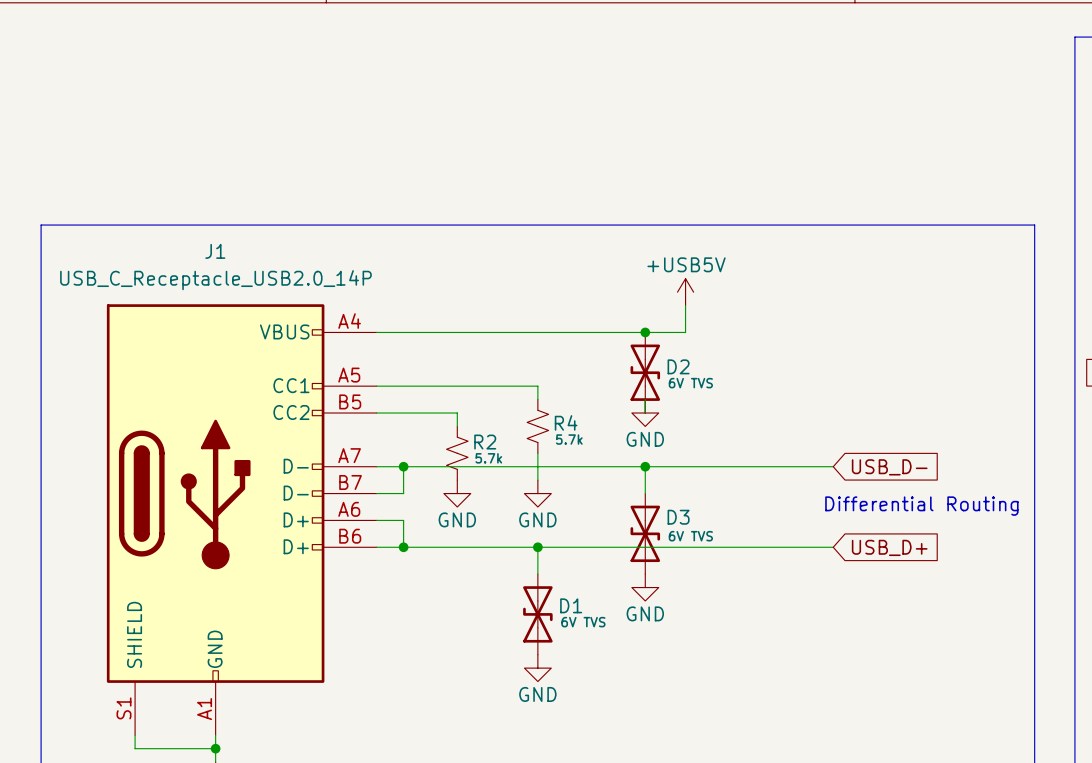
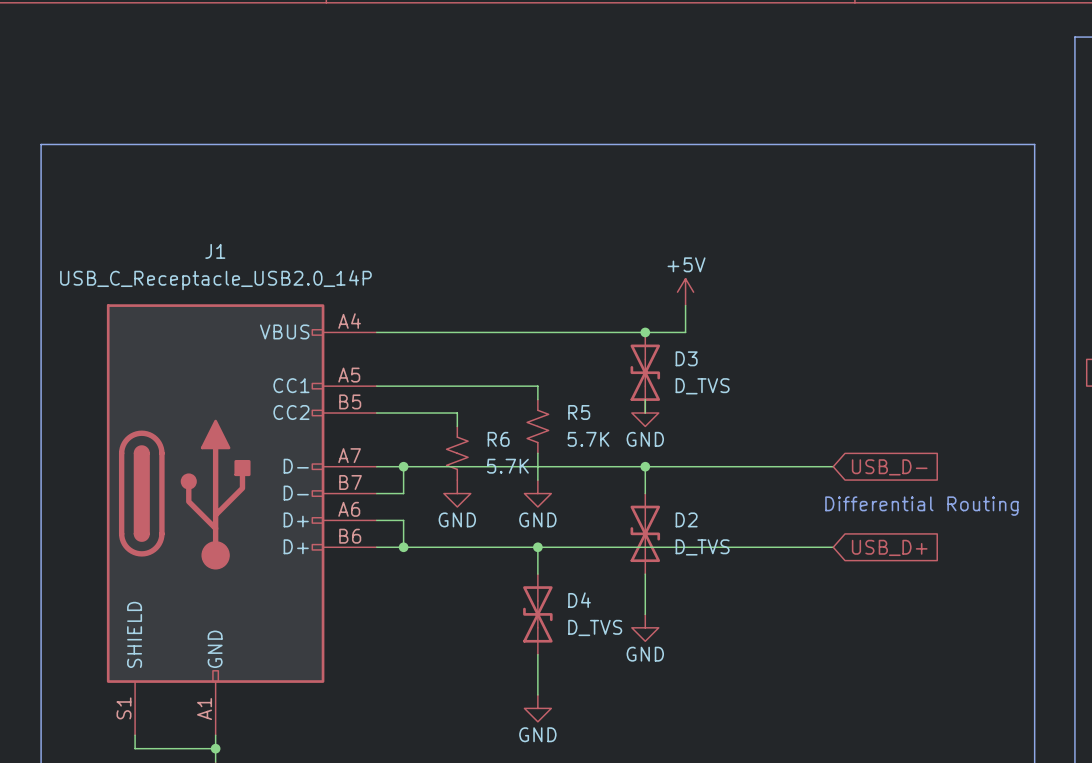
line: (41, 225) (1034, 225) -> (41, 225) (41, 144) (1034, 144) (1034, 225)
power symbol: +USB5V (685, 292) -> +5V (685, 292)
D2 name: D2 (678, 366) -> D3 (686, 358)
D2 value: 6V TVS (690, 383) -> D_TVS (702, 386)
R4 name: R4 (566, 422) -> R5 (579, 412)
R4 value: 5.7k (569, 439) -> 5.7K (588, 439)
R2 name: R2 (485, 442) -> R6 (498, 439)
R2 value: 5.7k (488, 458) -> 5.7K (507, 466)
D3 name: D3 (678, 517) -> D2 (686, 519)
D3 value: 6V TVS (690, 536) -> D_TVS (702, 547)
wire: none -> (645, 574) (645, 614)
power symbol position: GND (645, 587) -> GND (645, 627)
D1 name: D1 (571, 605) -> D4 (579, 600)
D1 value: 6V TVS (583, 622) -> D_TVS (595, 627)
wire: none -> (537, 654) (537, 694)
power symbol position: GND (537, 668) -> GND (537, 708)

